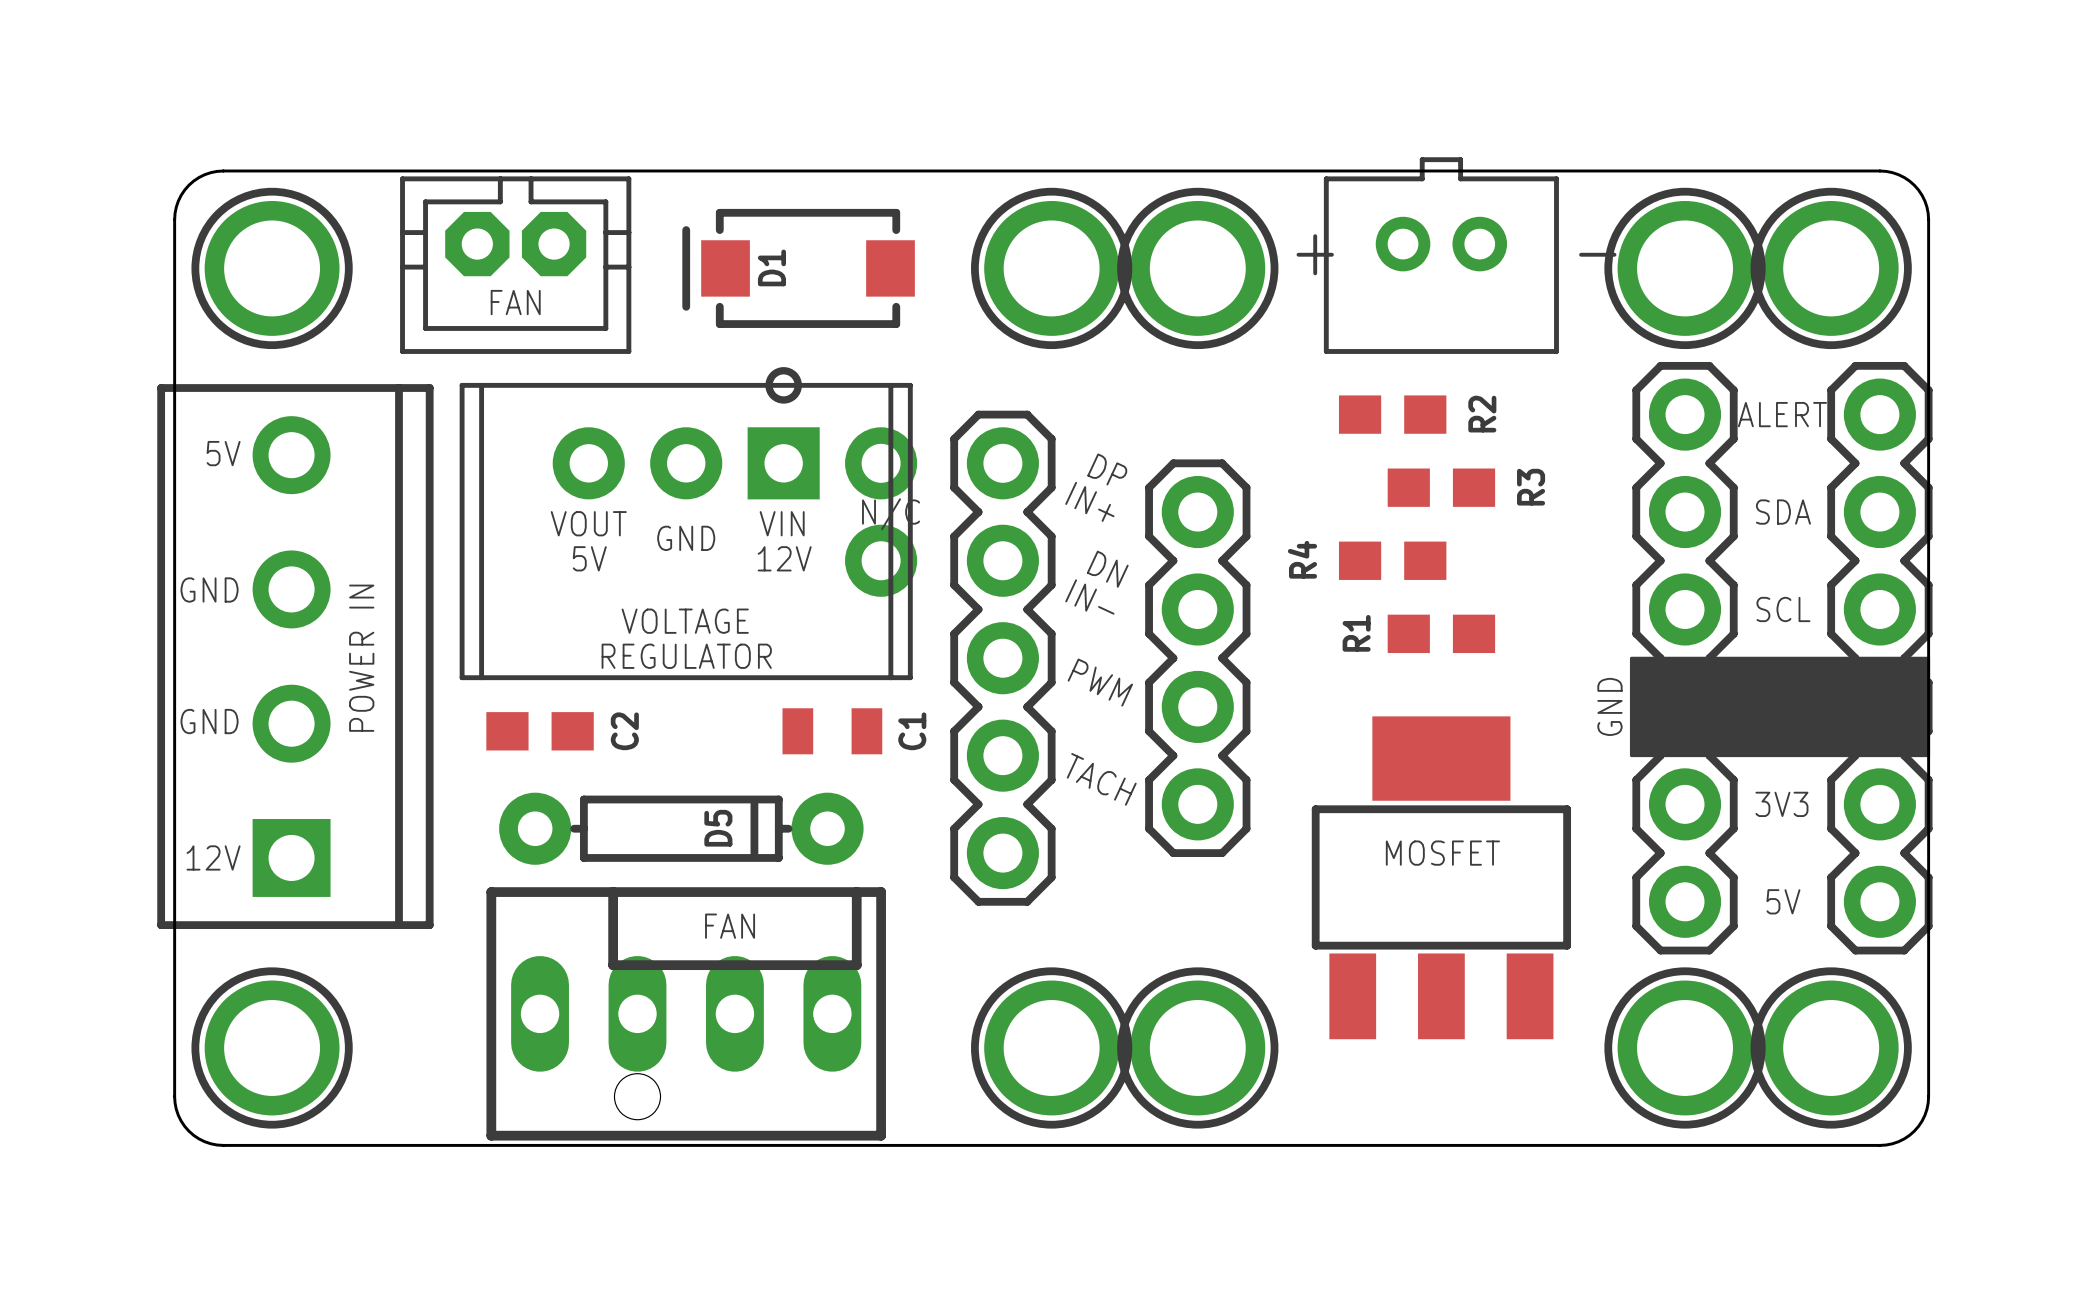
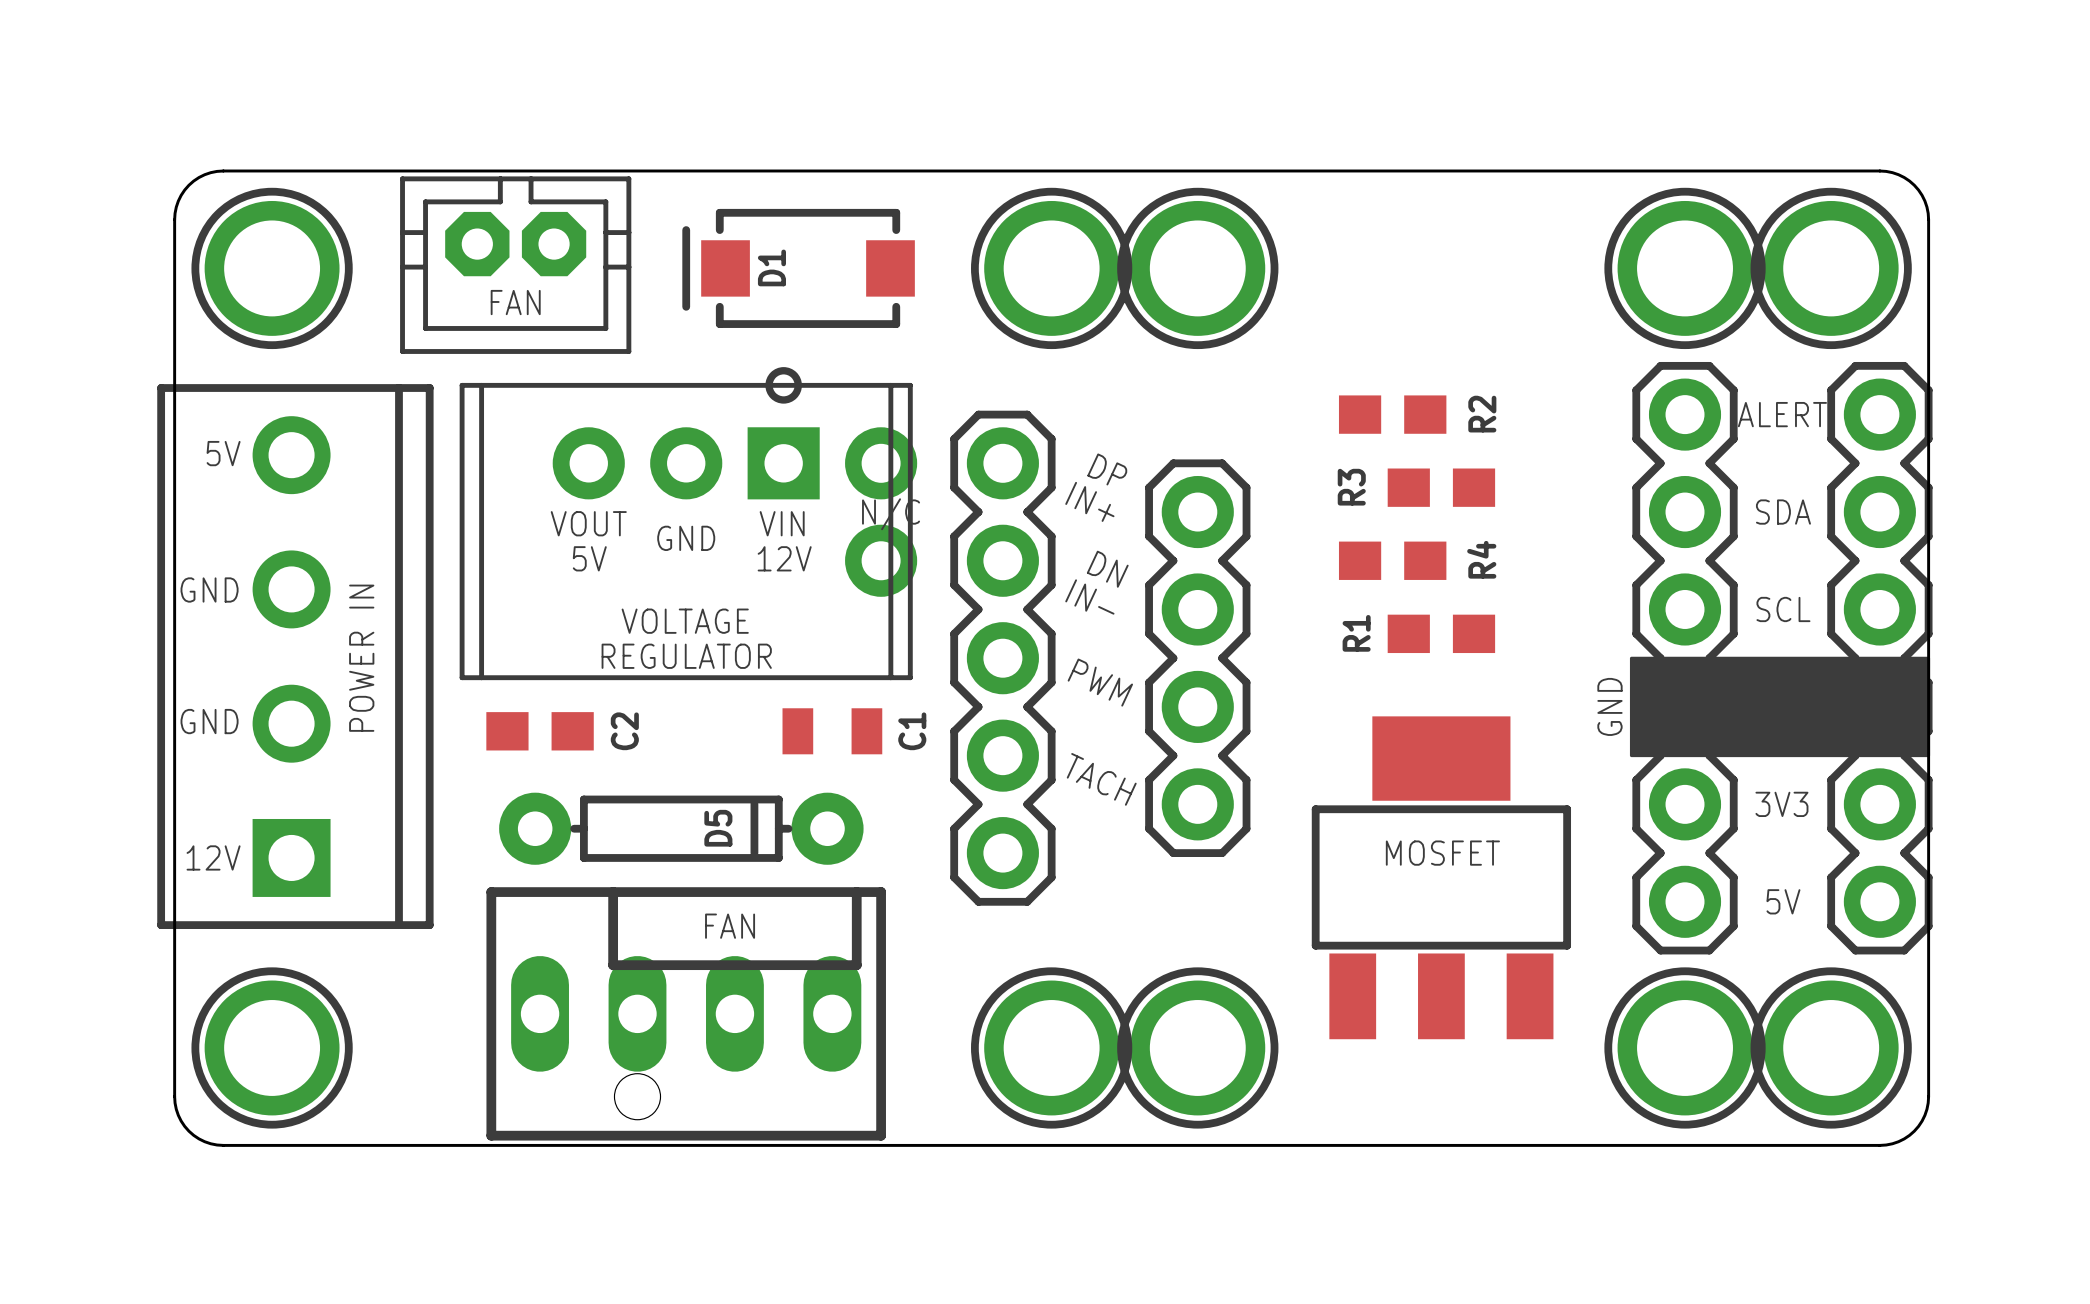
part: (1441, 255) -> none
R3 name position: R3 (1531, 487) -> R3 (1351, 487)
R4 name position: R4 (1302, 559) -> R4 (1481, 559)

